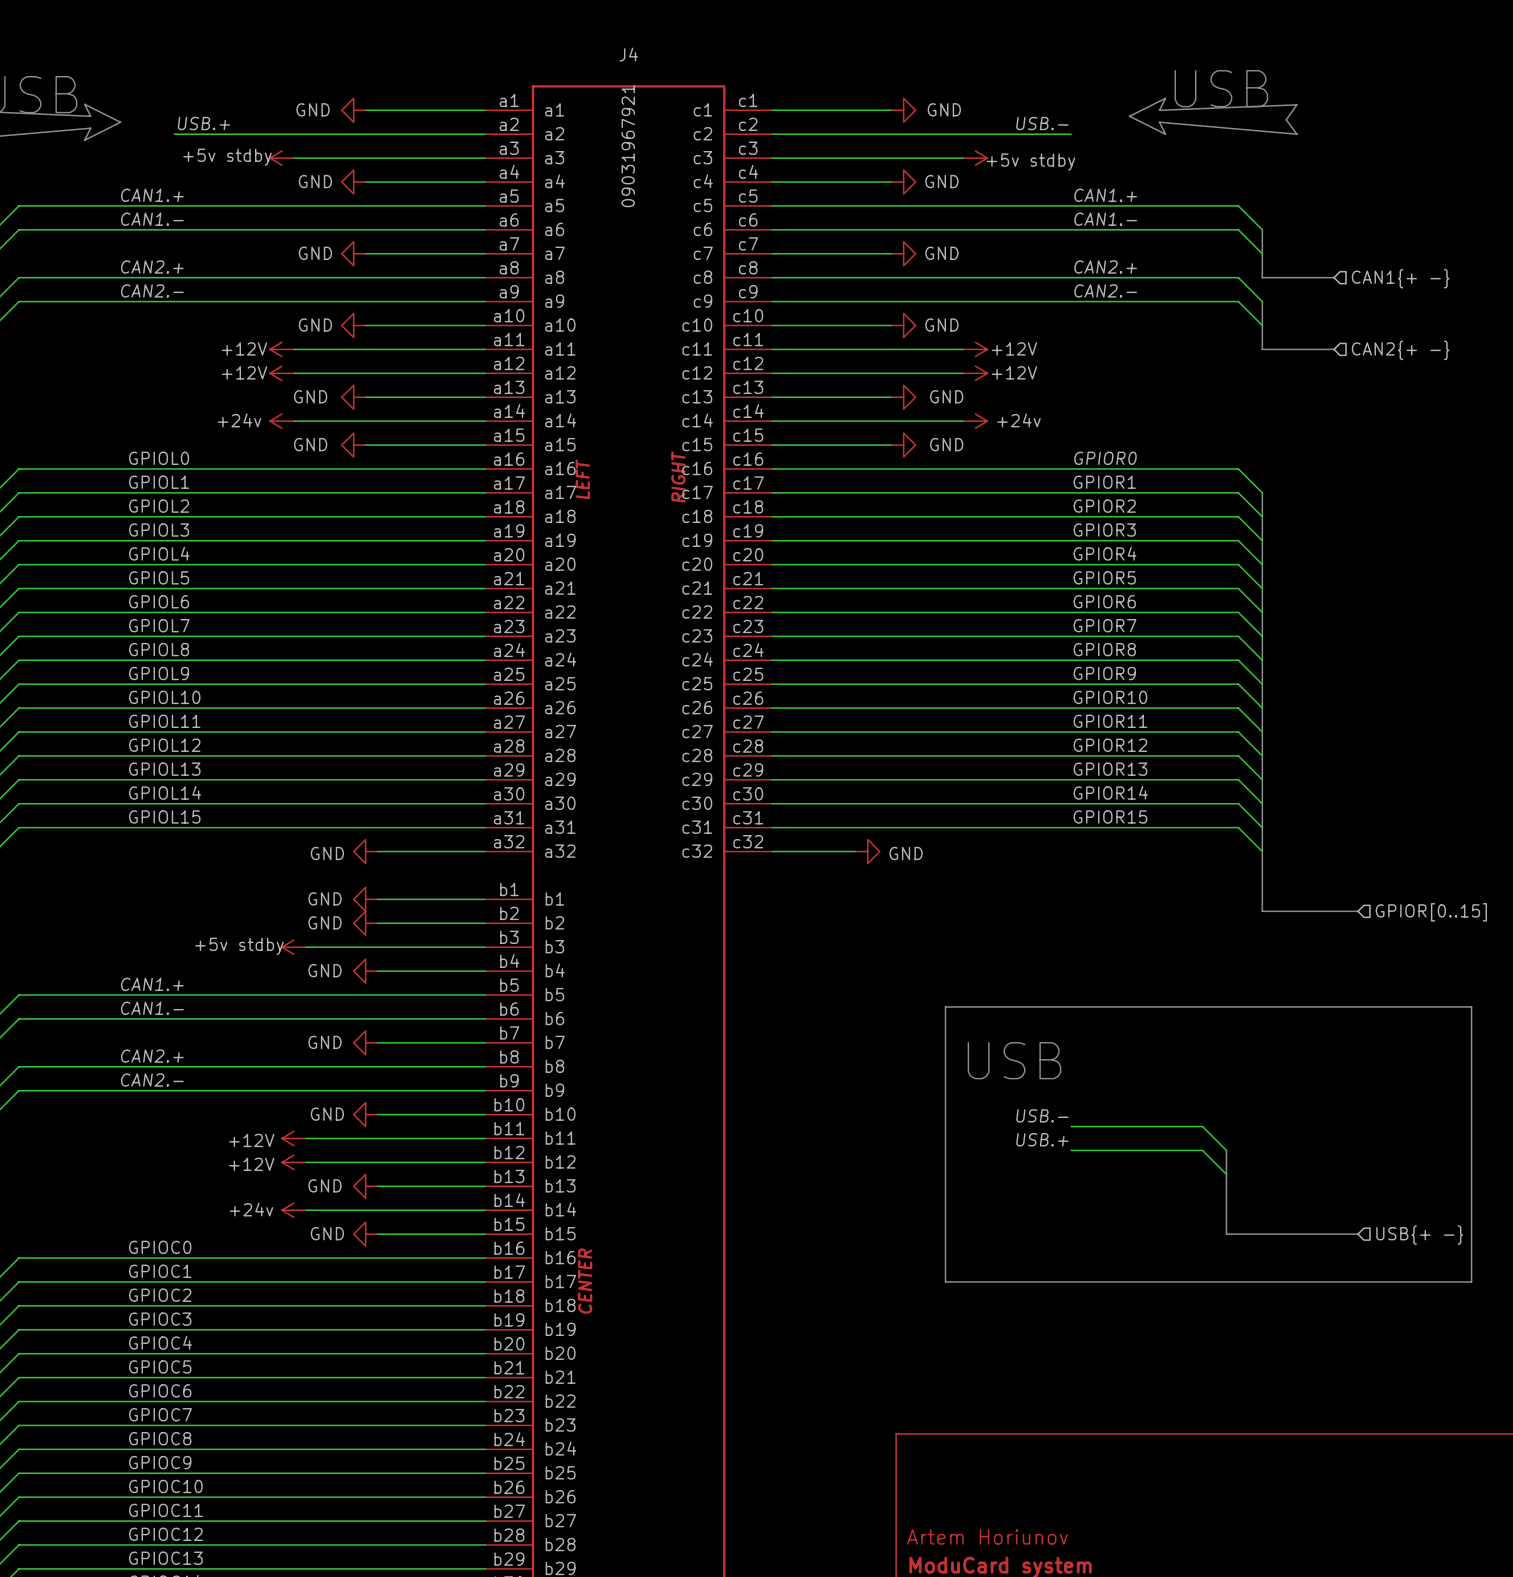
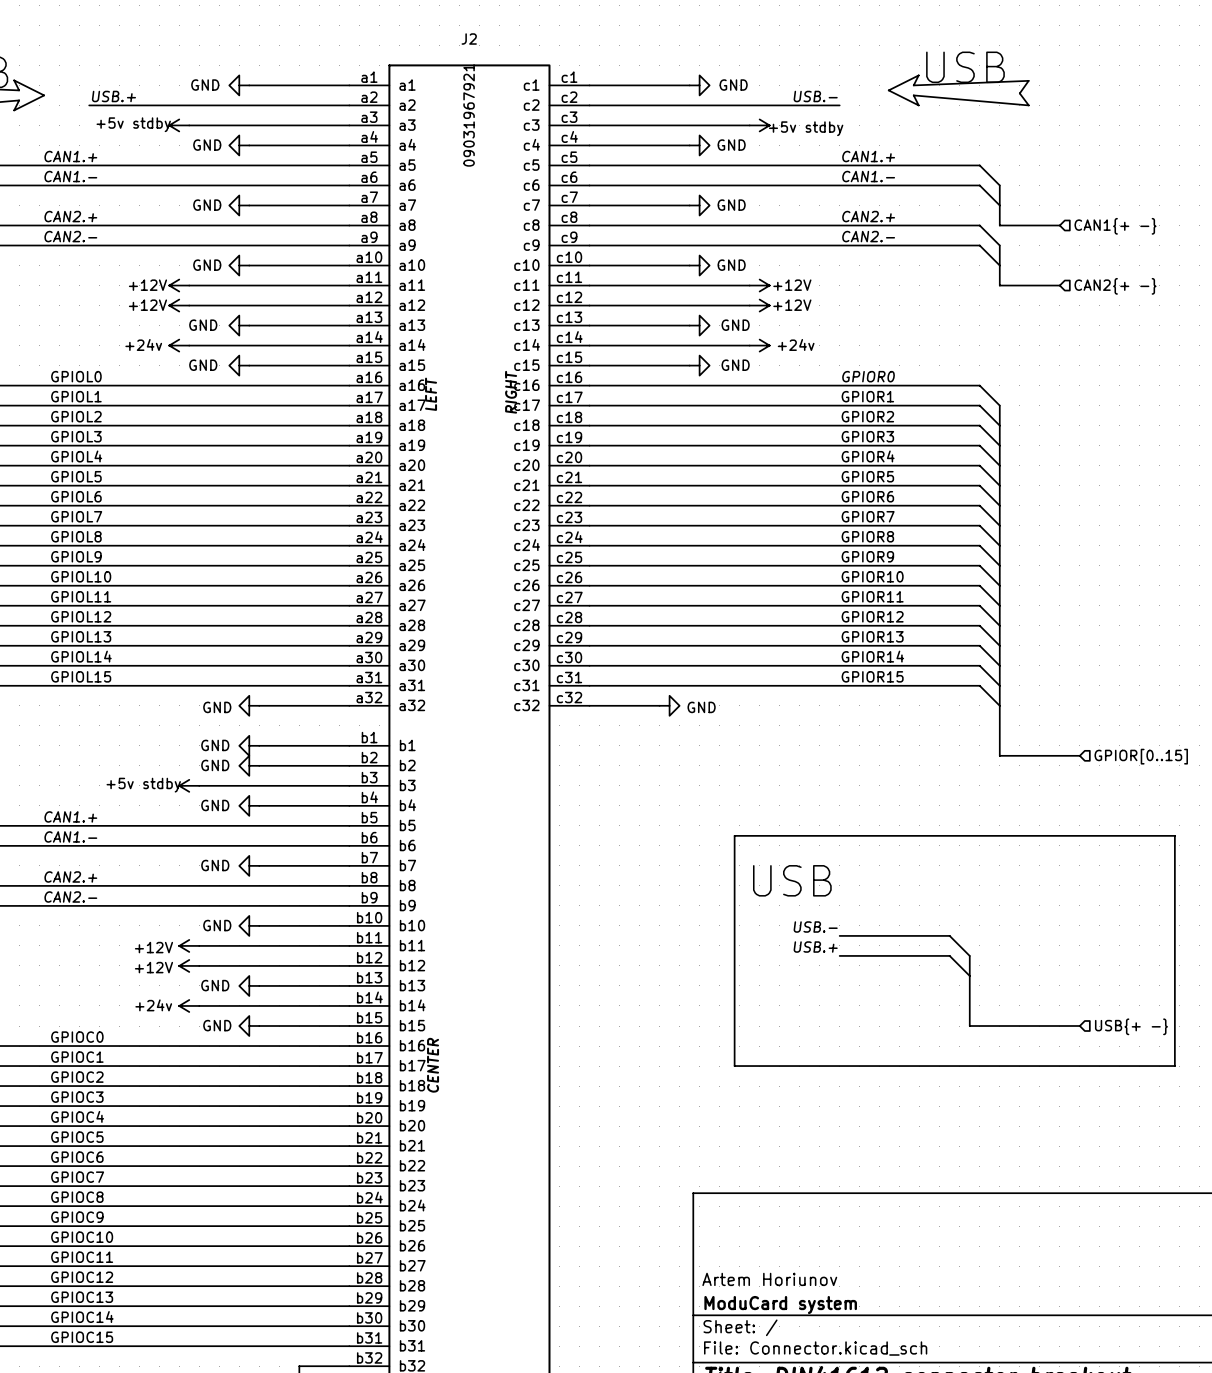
J4 name: J4 (628, 54) -> J2 (469, 39)

